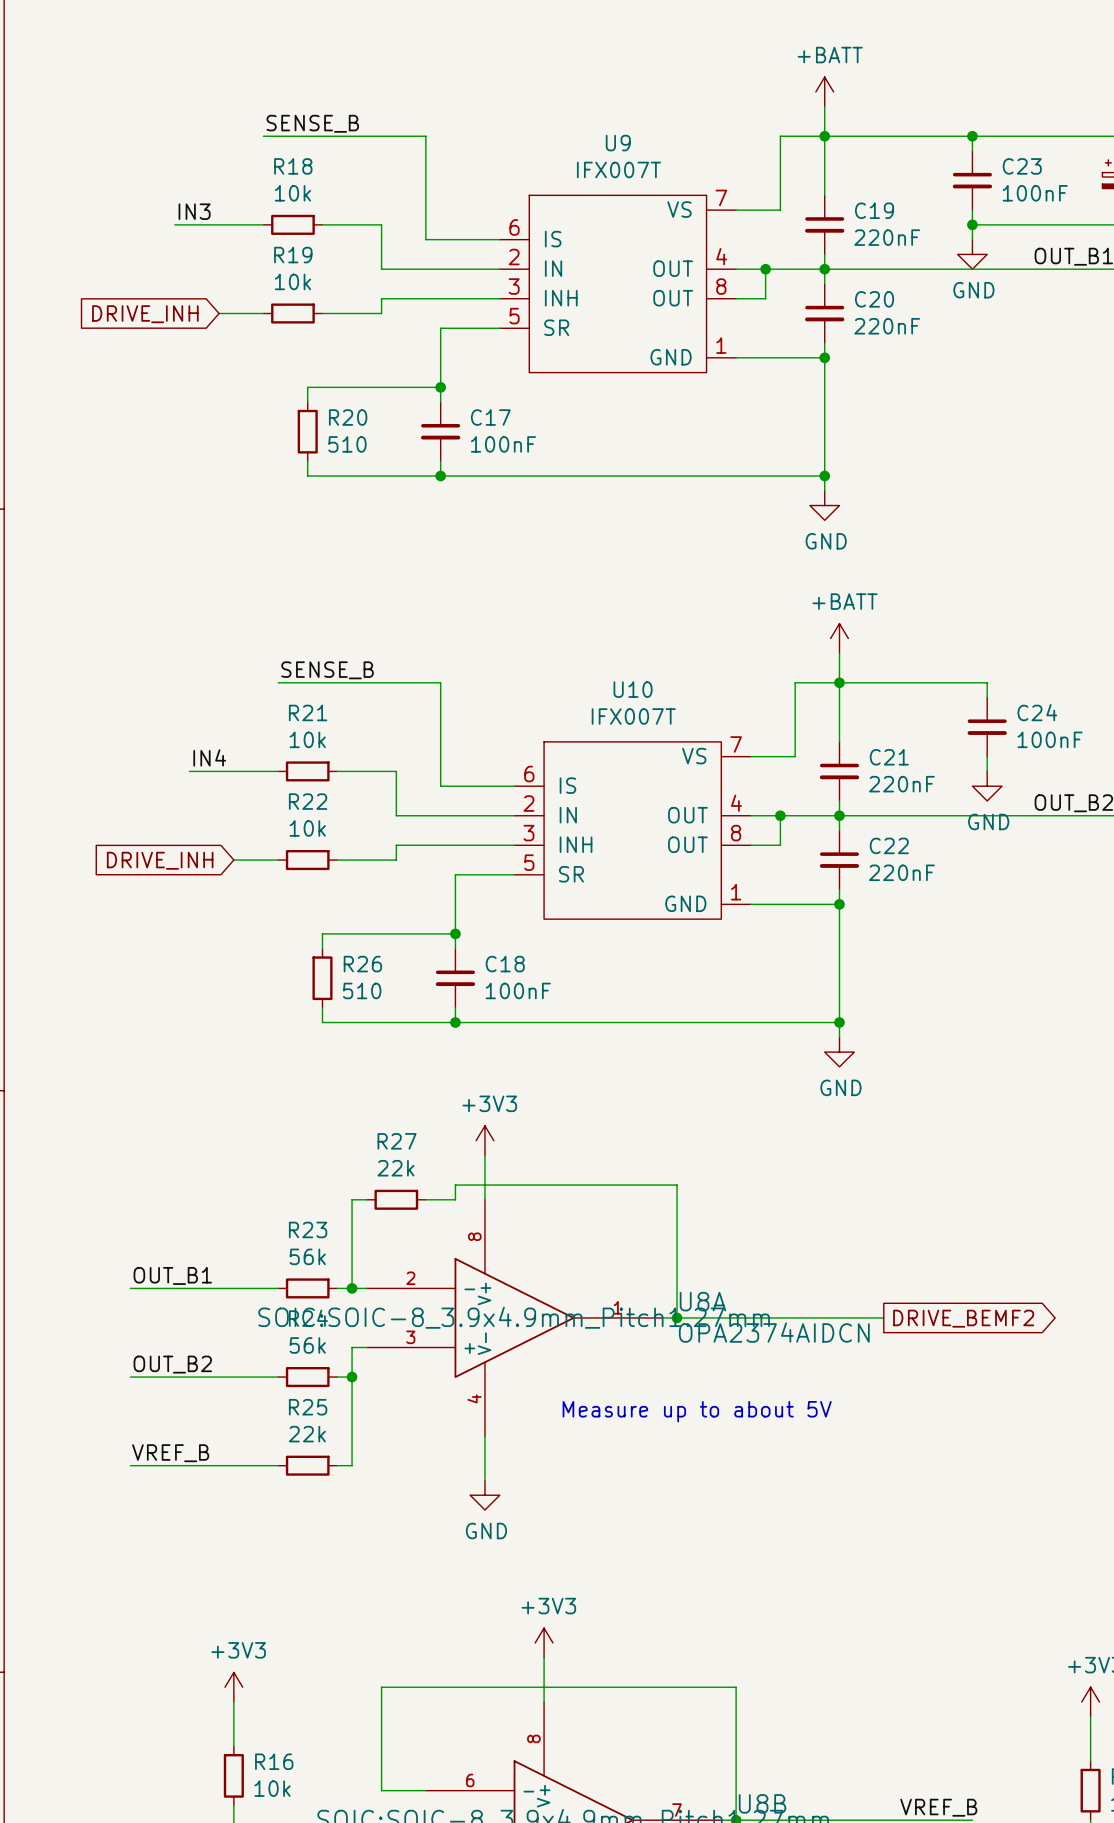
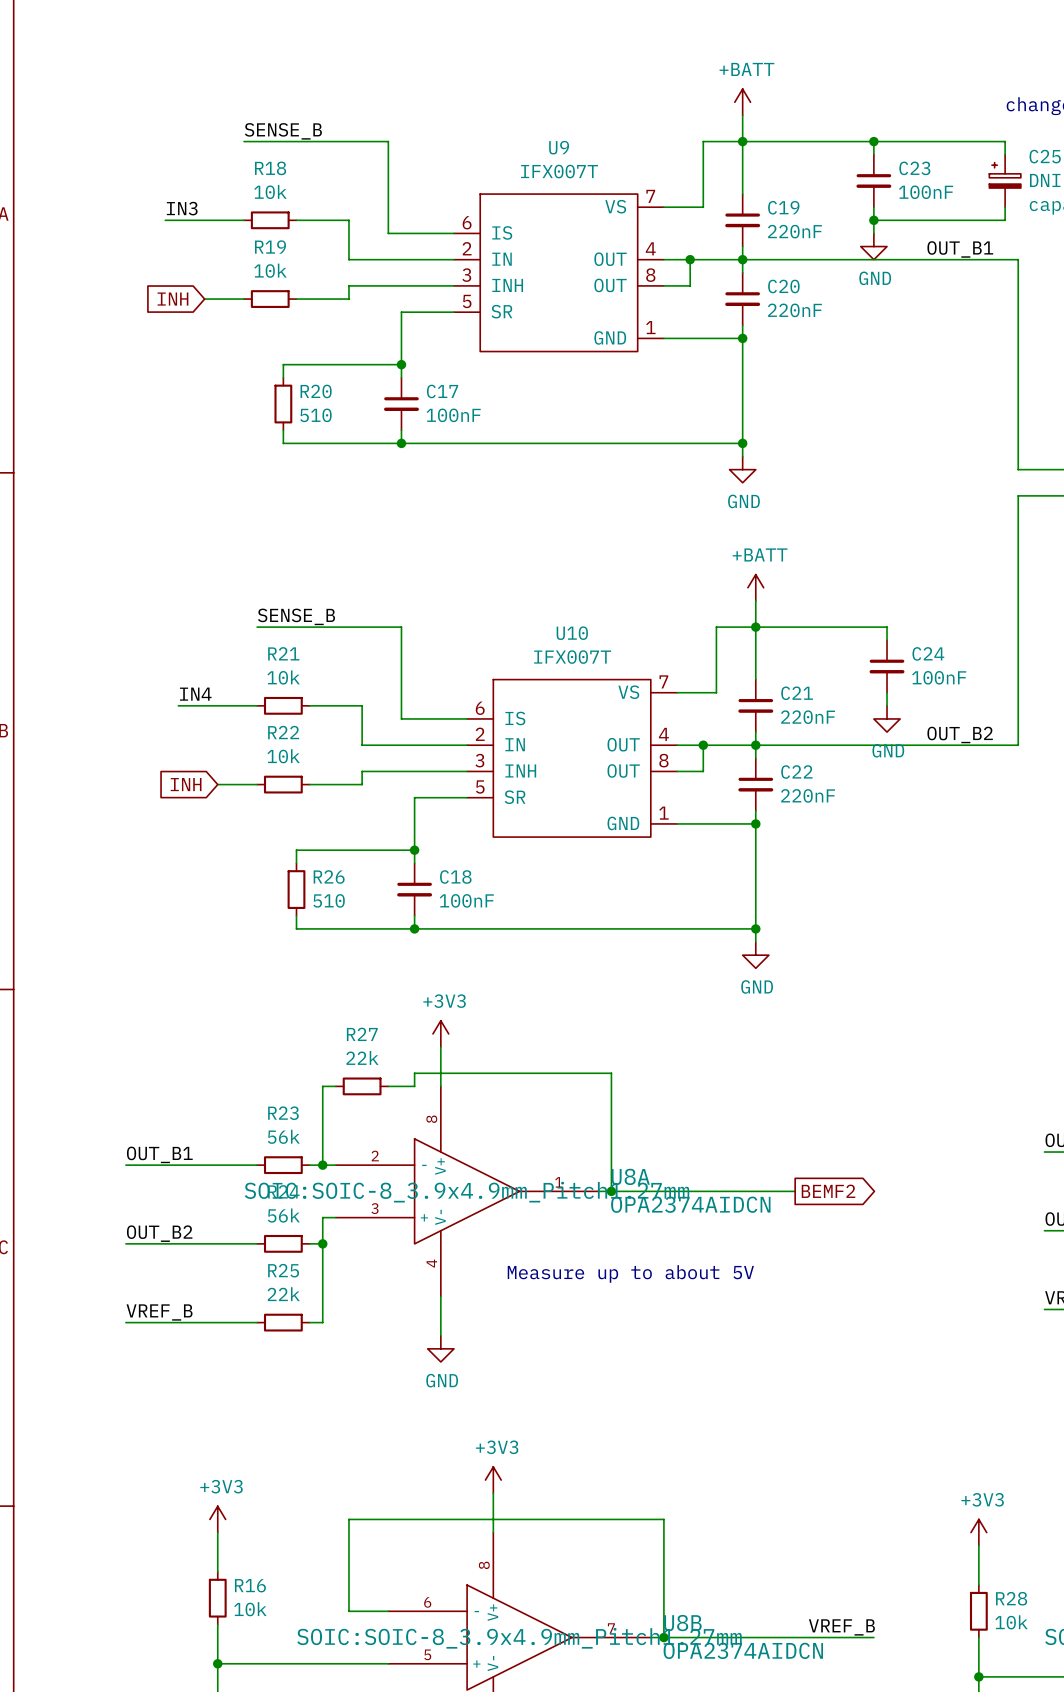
global label: DRIVE_INH (145, 314) -> INH (172, 299)
global label: DRIVE_INH (160, 860) -> INH (186, 784)
global label: DRIVE_BEMF2 (963, 1318) -> BEMF2 (828, 1191)

